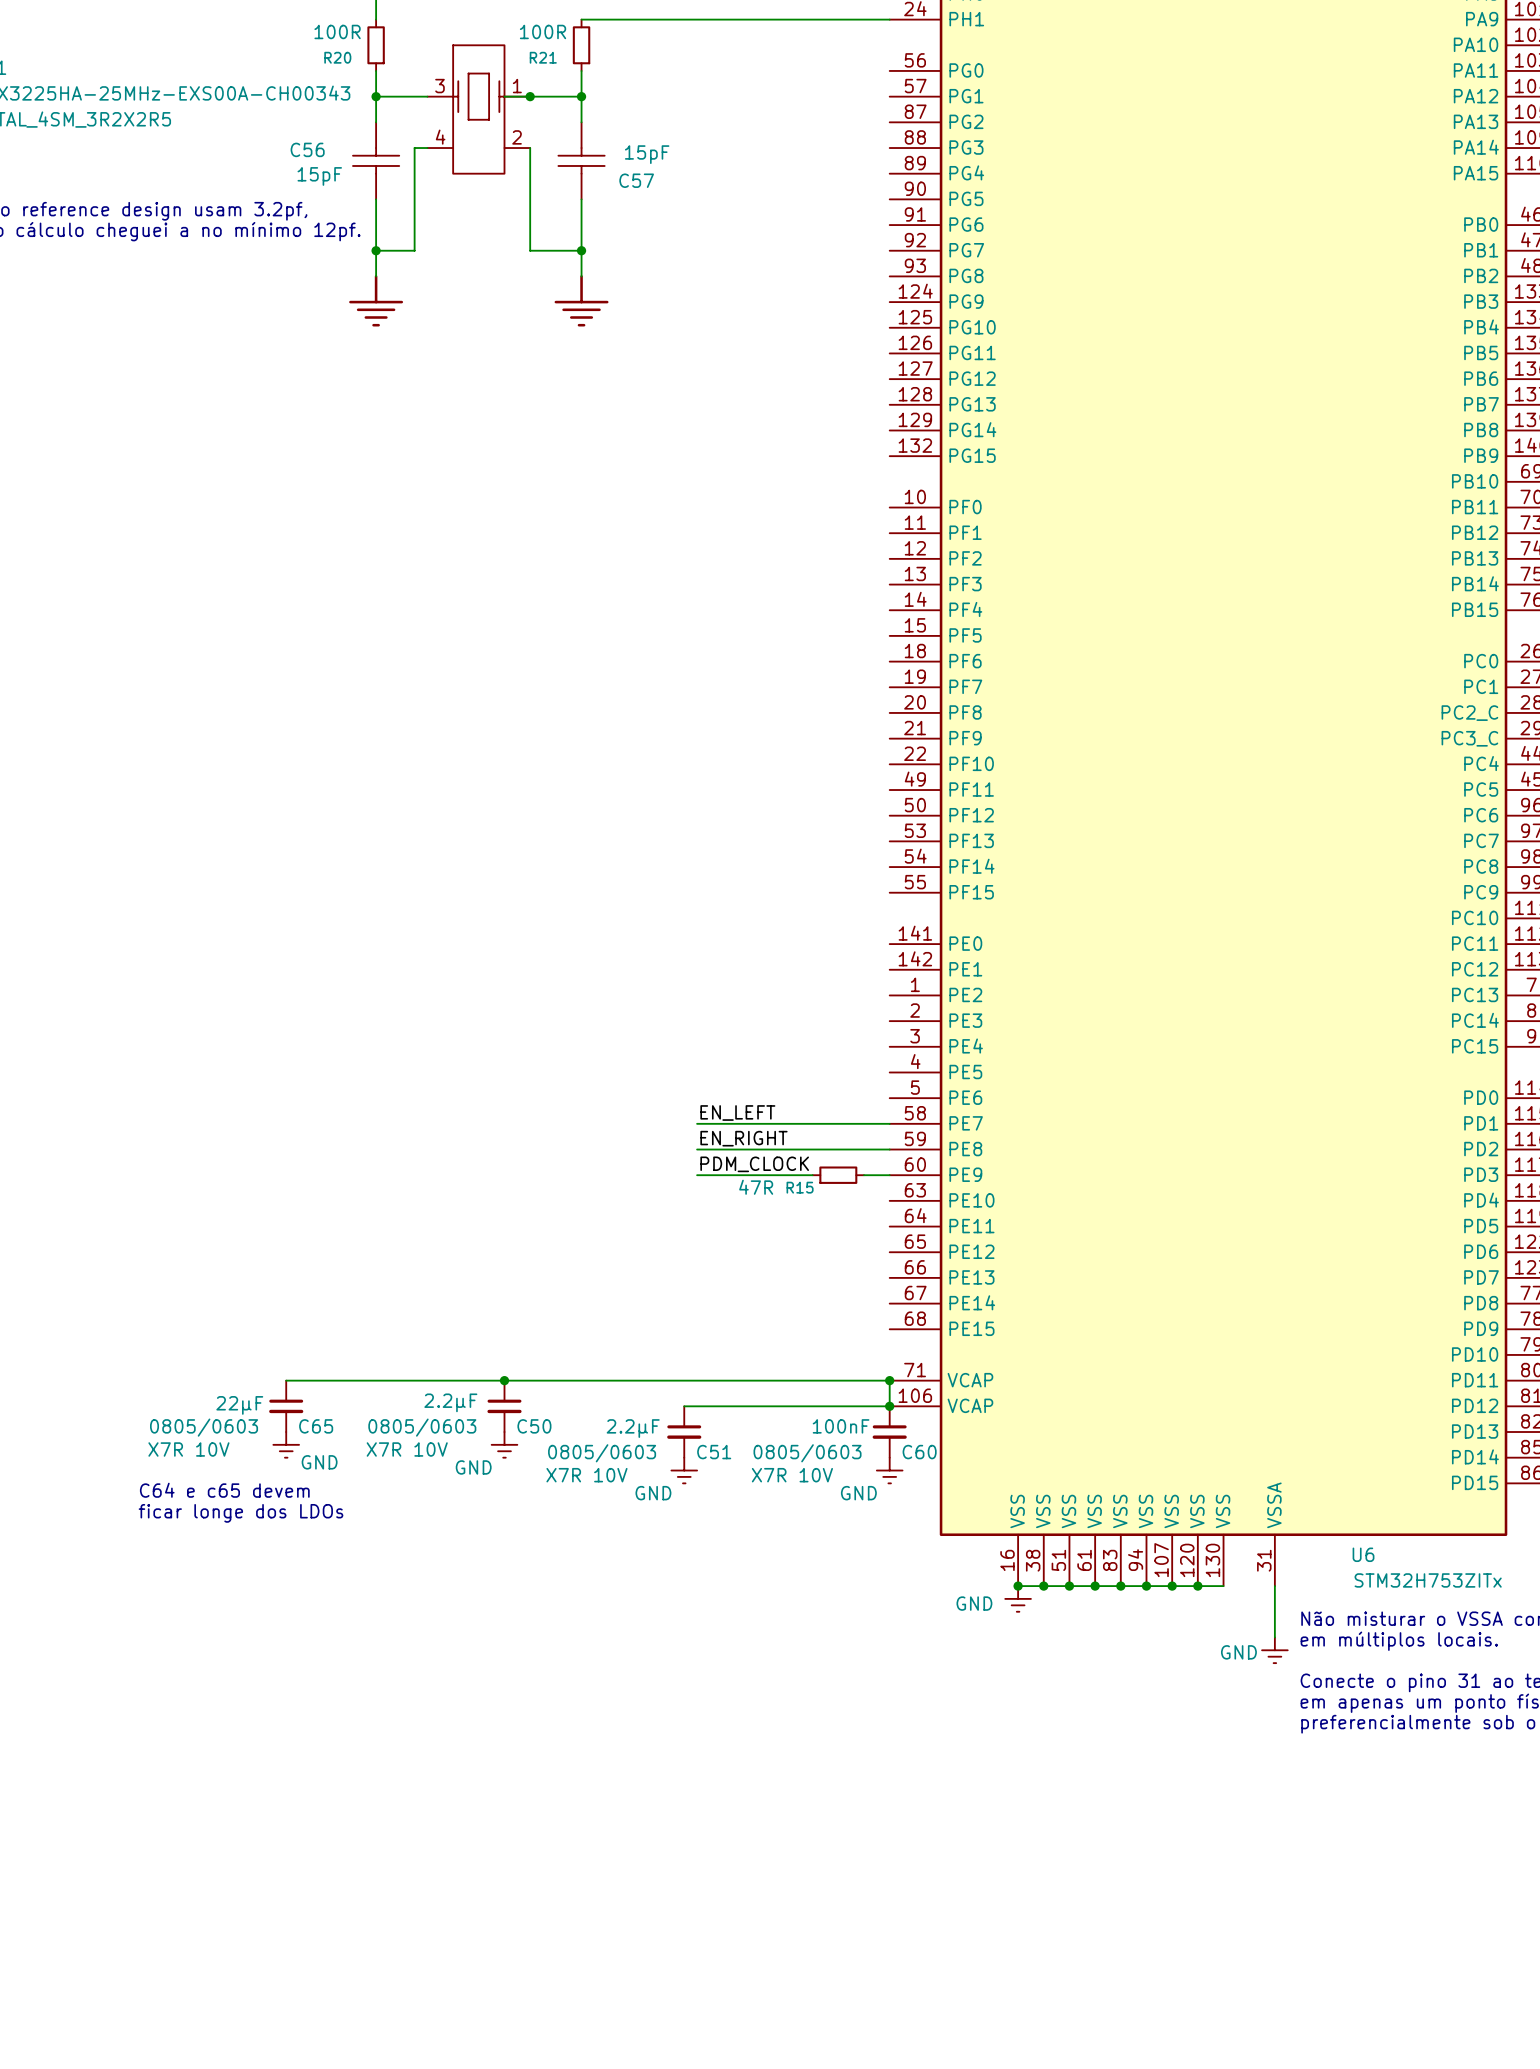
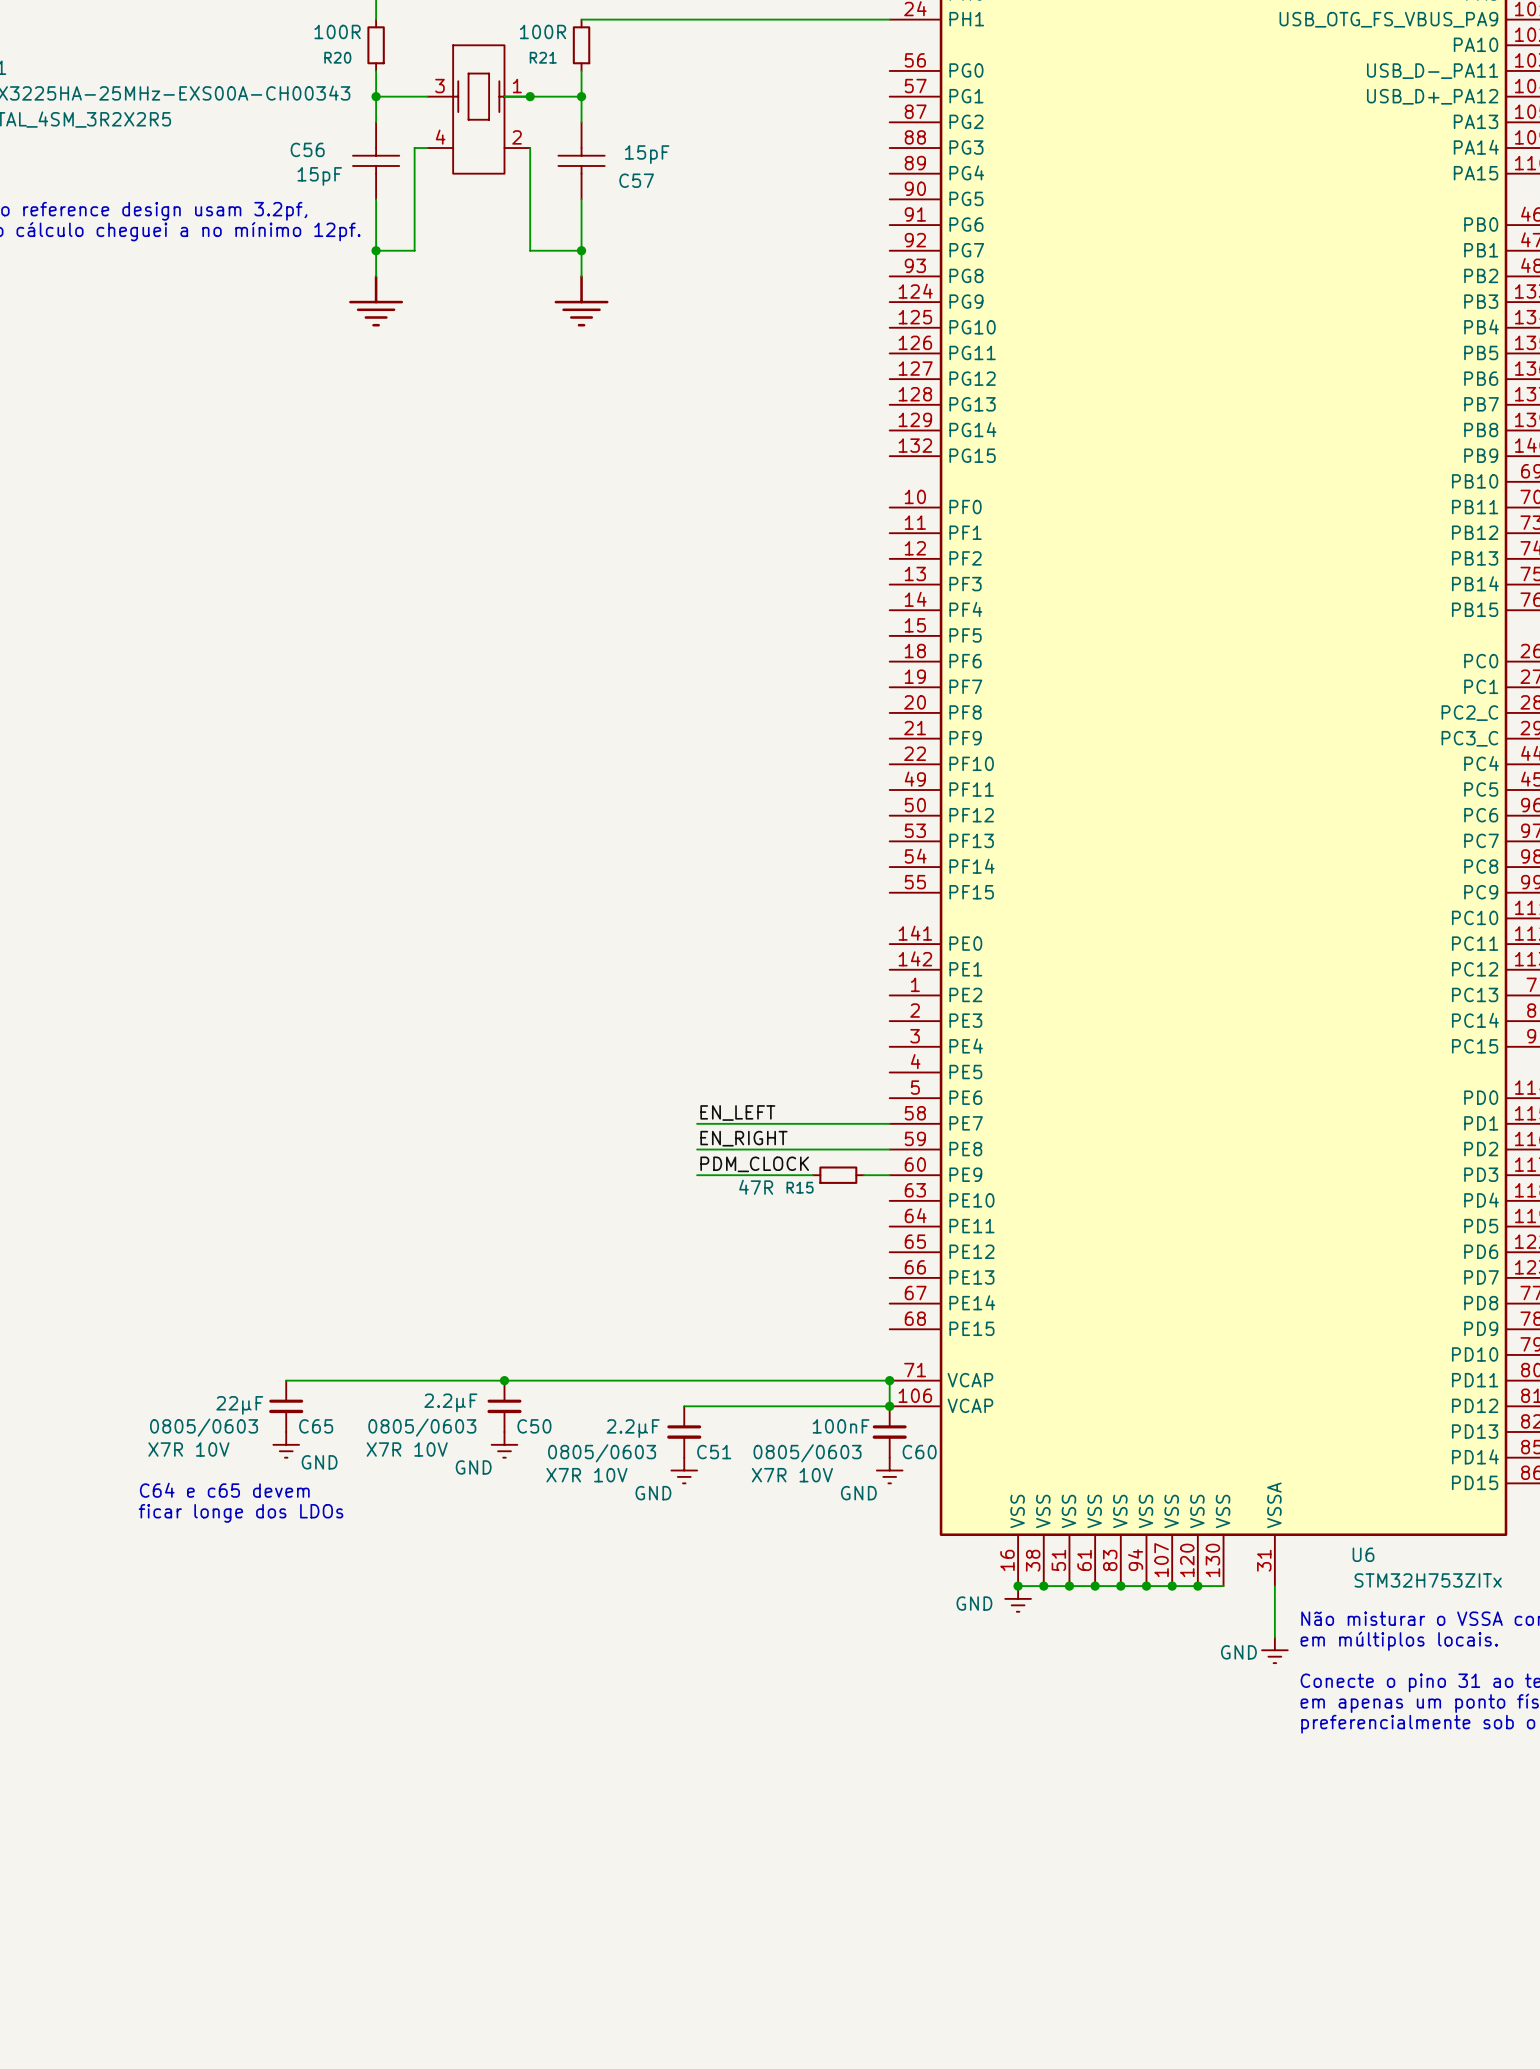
U6 pin name: PA9 (1482, 19) -> USB_OTG_FS_VBUS_PA9 (1388, 19)
U6 pin name: PA11 (1476, 70) -> USB_D-_PA11 (1432, 71)
U6 pin name: PA12 (1476, 96) -> USB_D+_PA12 (1432, 96)

